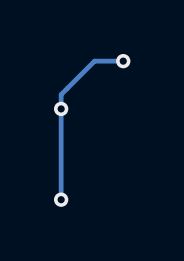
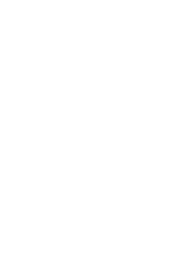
track: (123, 61) (94, 61) (61, 94) (61, 199) -> none
via: (123, 61) -> none
via: (61, 108) -> none
via: (61, 199) -> none

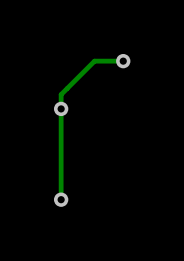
track: none -> (123, 61) (94, 61) (61, 94) (61, 199)
via: none -> (123, 61)
via: none -> (61, 108)
via: none -> (61, 199)

